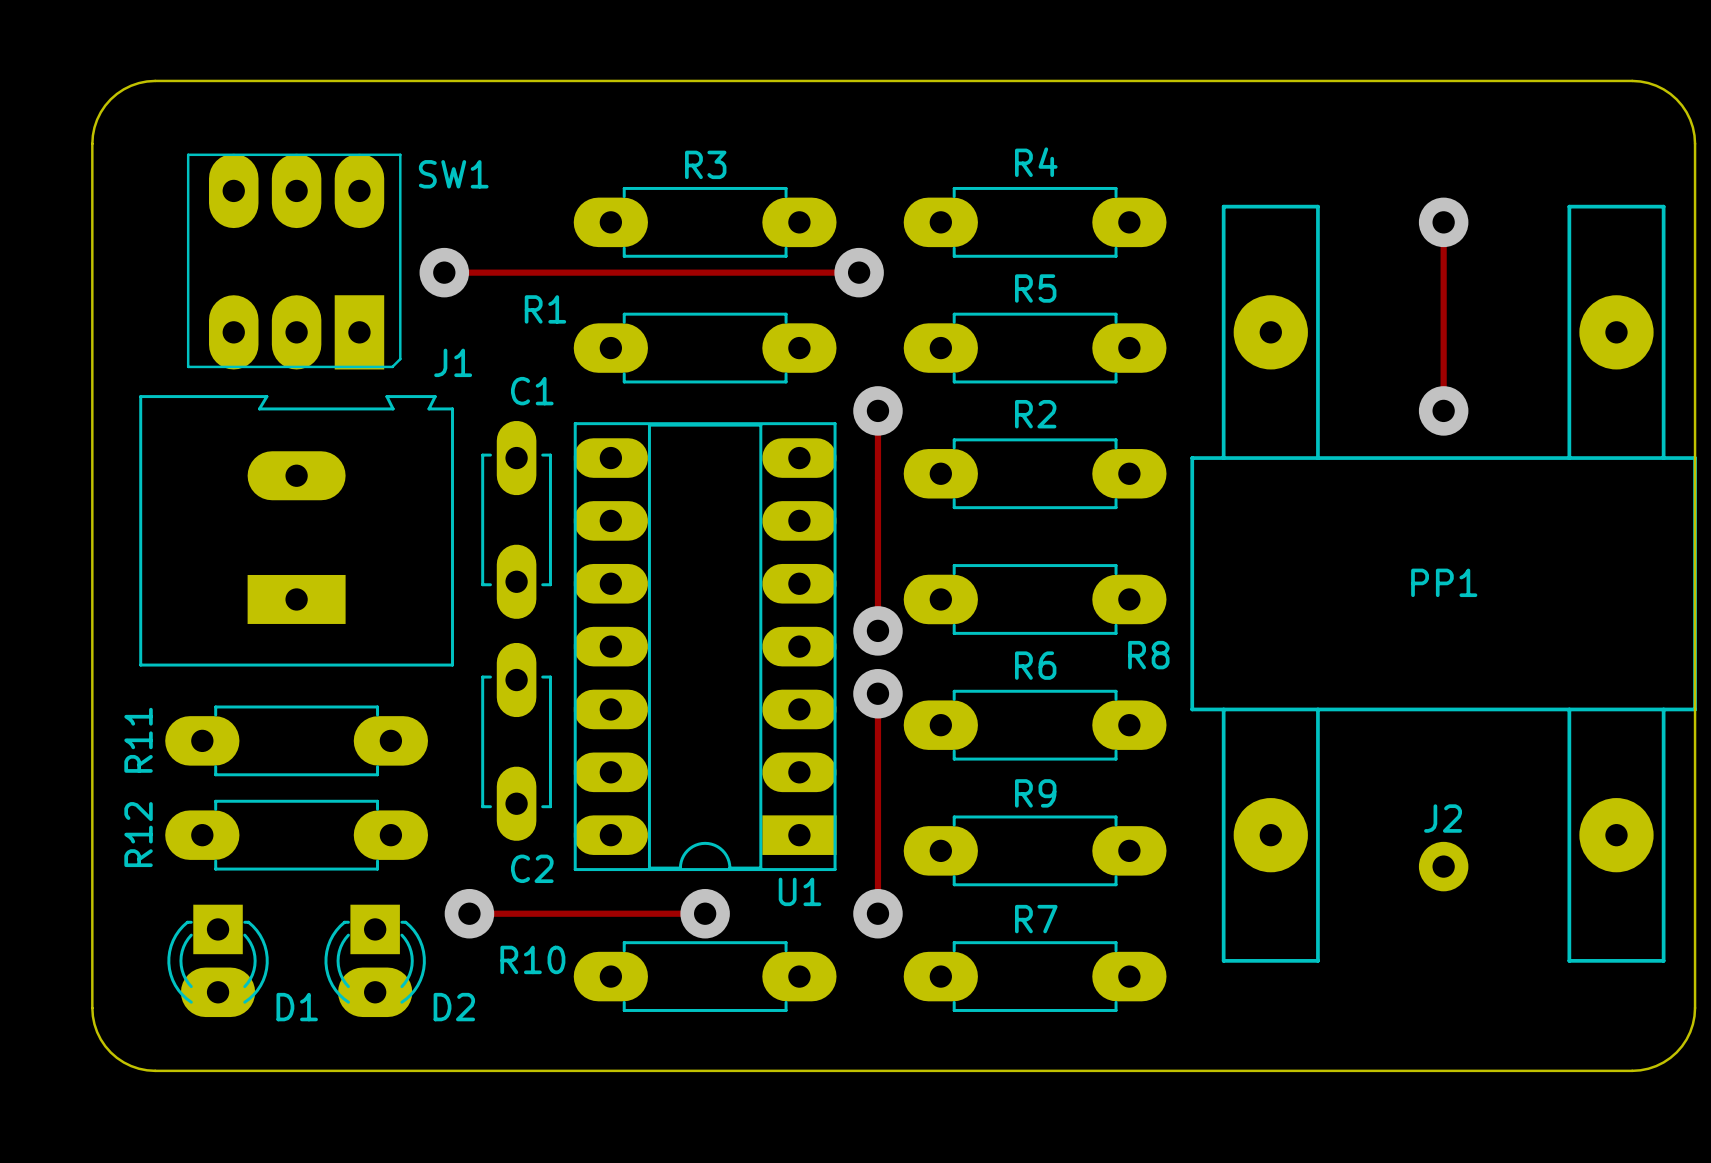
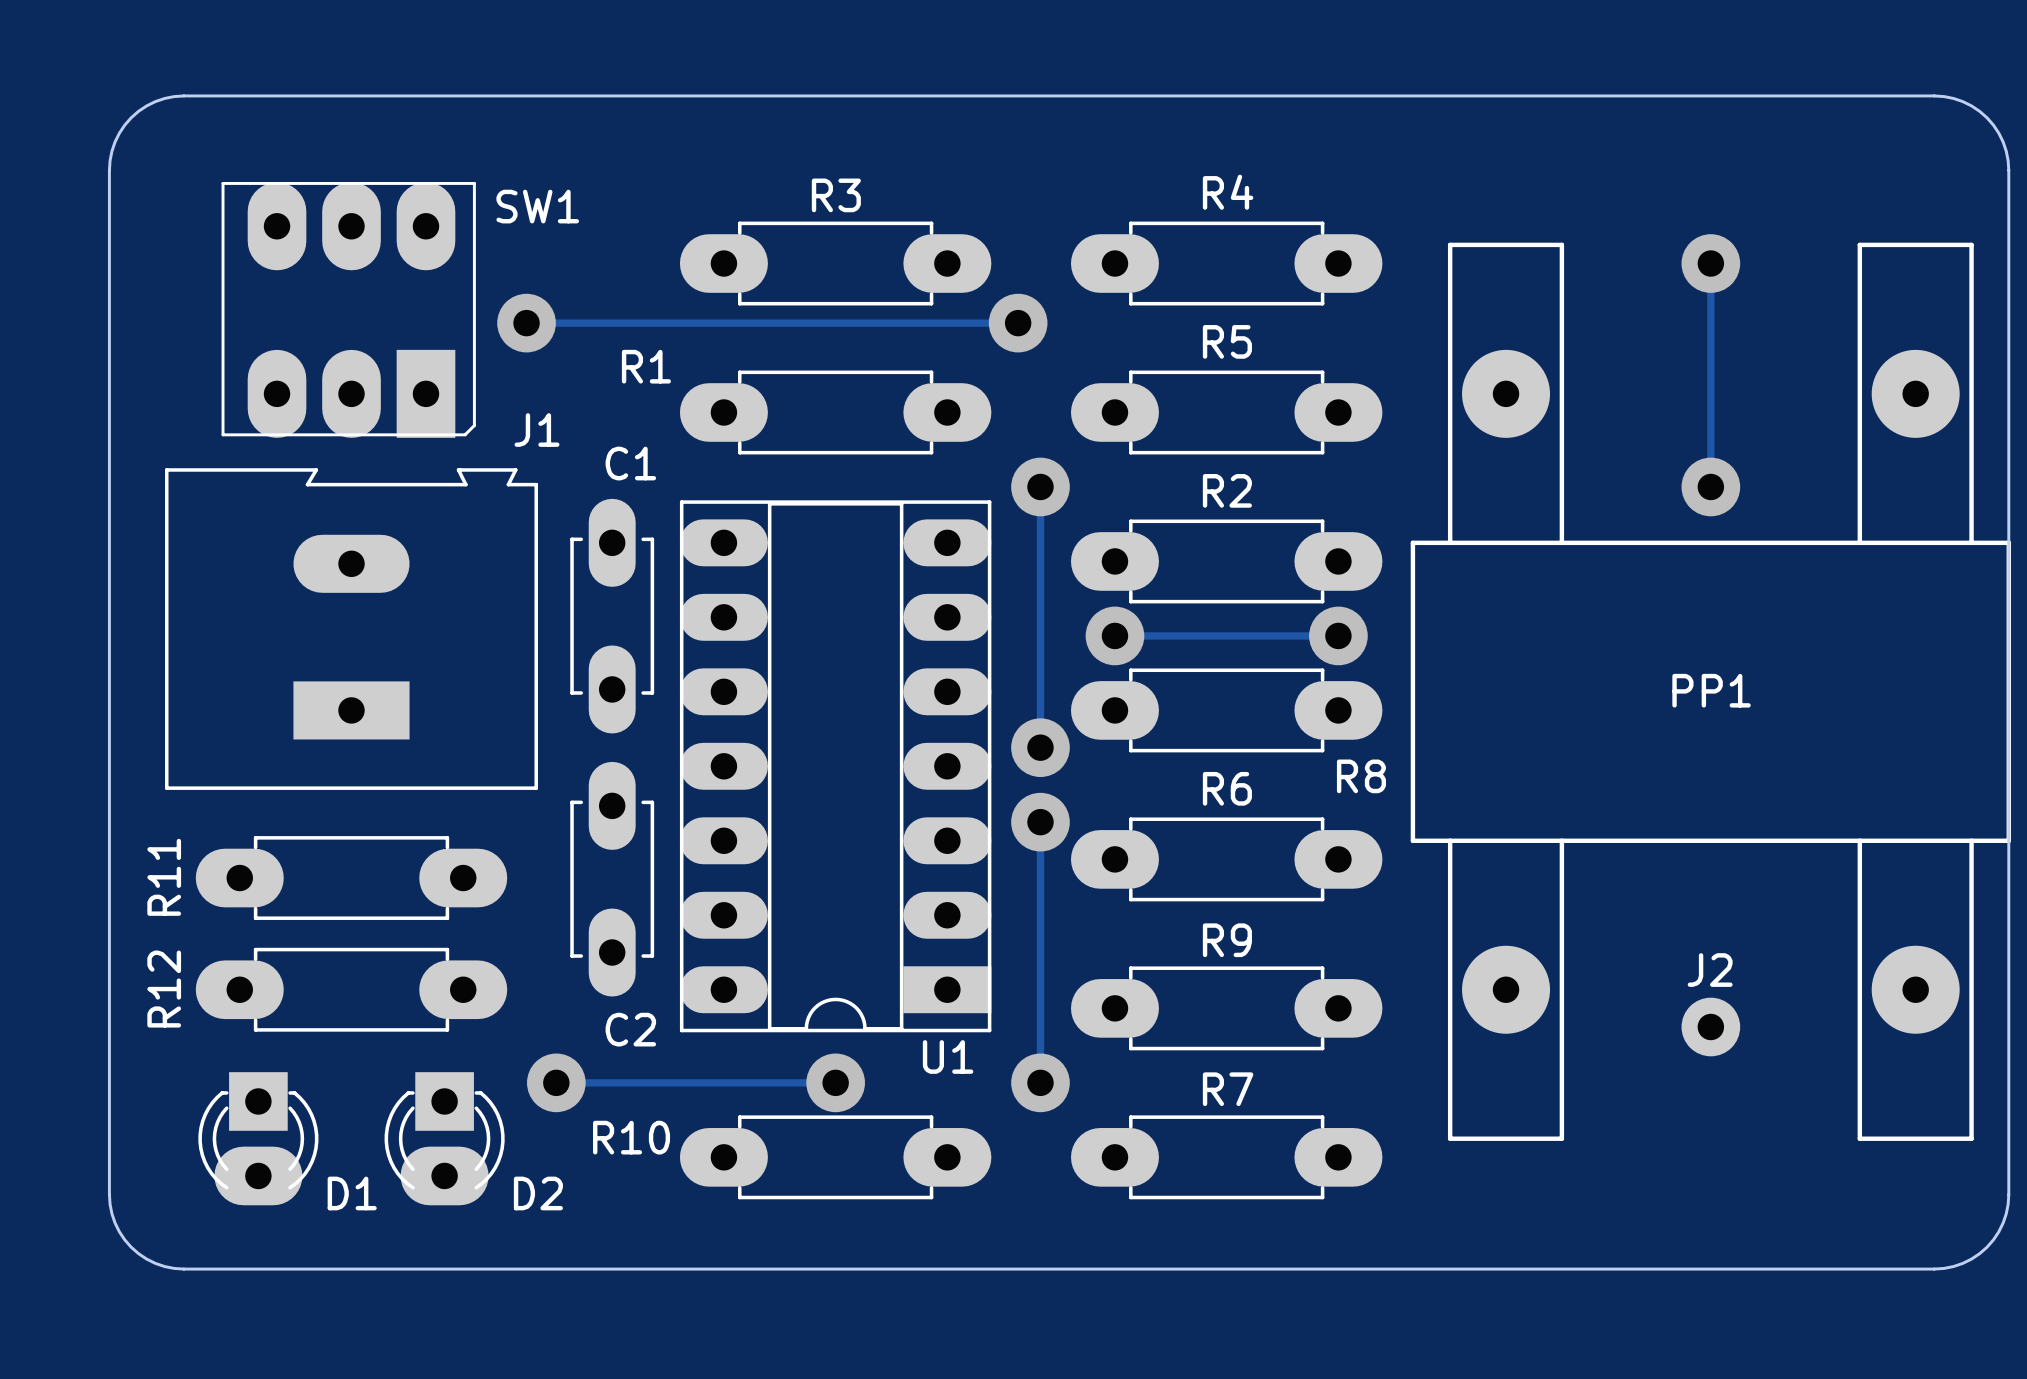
track: none -> (1114, 635) (1338, 635)
via: none -> (1114, 635)
via: none -> (1338, 635)

